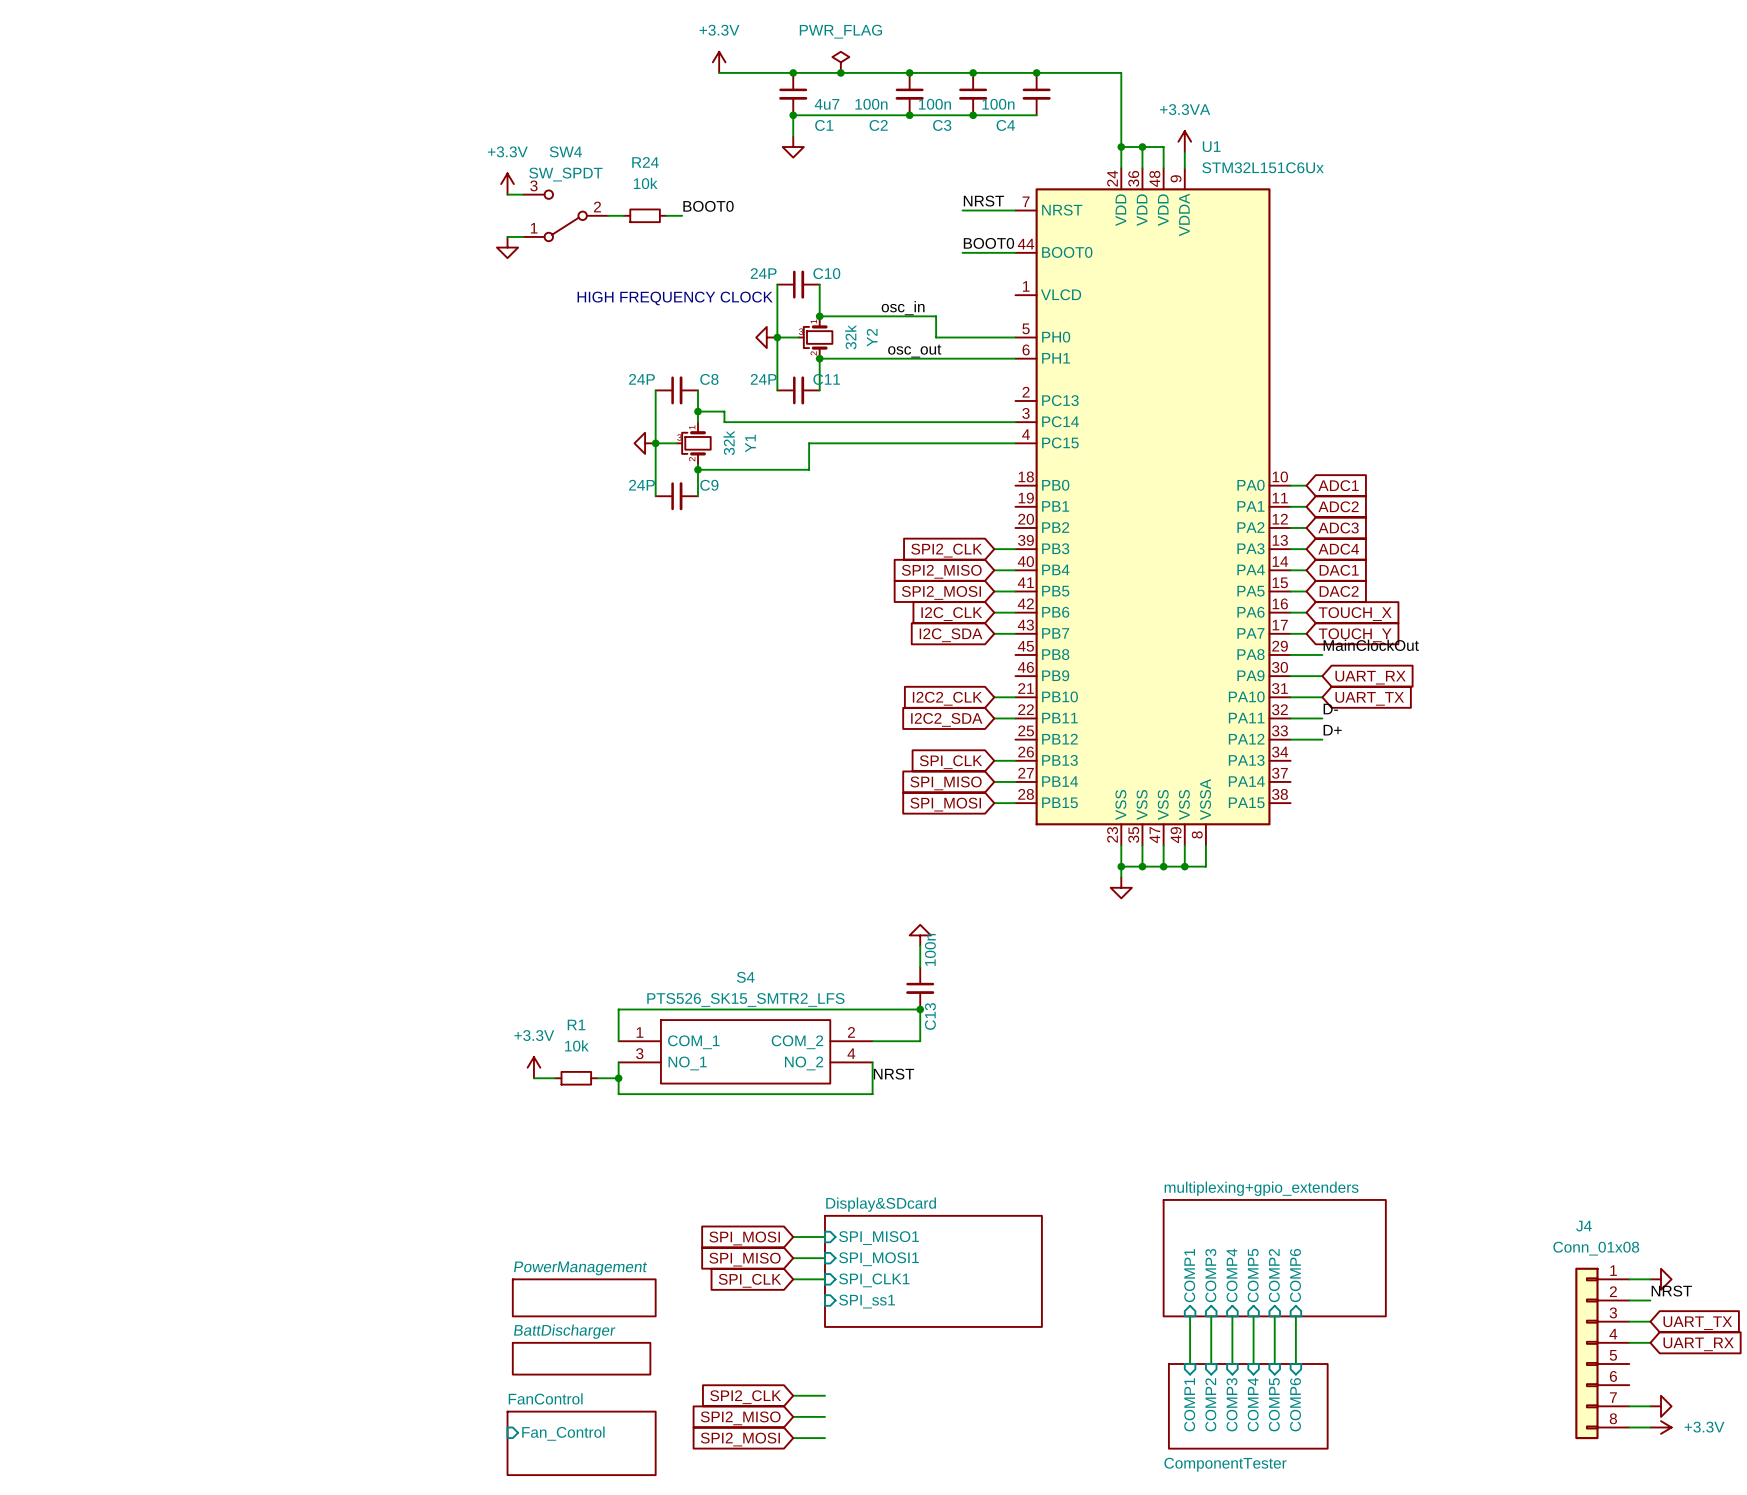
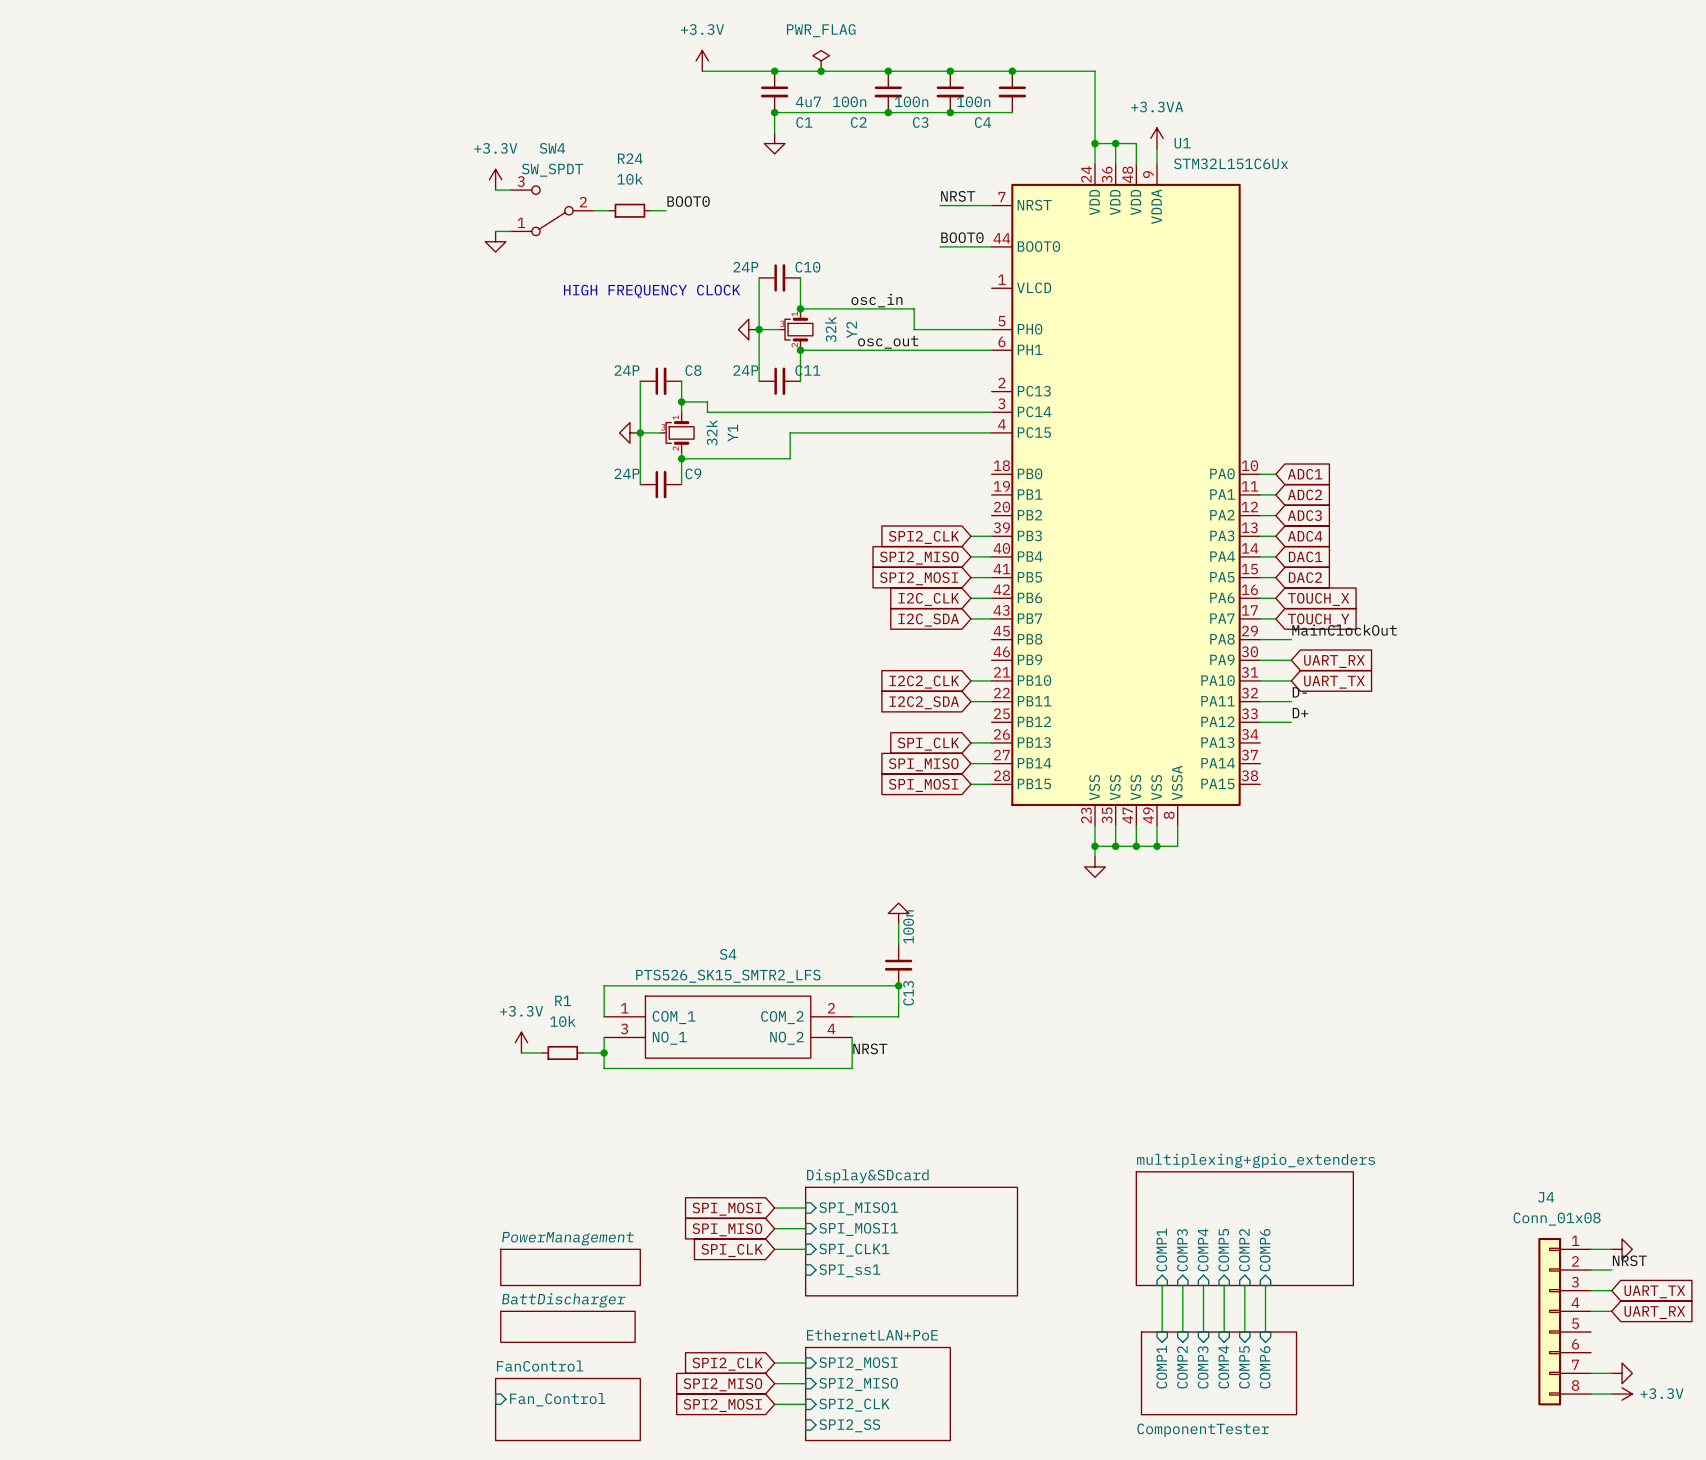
sheet pin: none -> SPI2_MOSI (858, 1363)
sheet pin: none -> SPI2_MISO (858, 1384)
sheet EthernetLAN+PoE: none -> (877, 1394)
sheet pin: none -> SPI2_CLK (854, 1405)
sheet pin: none -> SPI2_SS (849, 1425)

